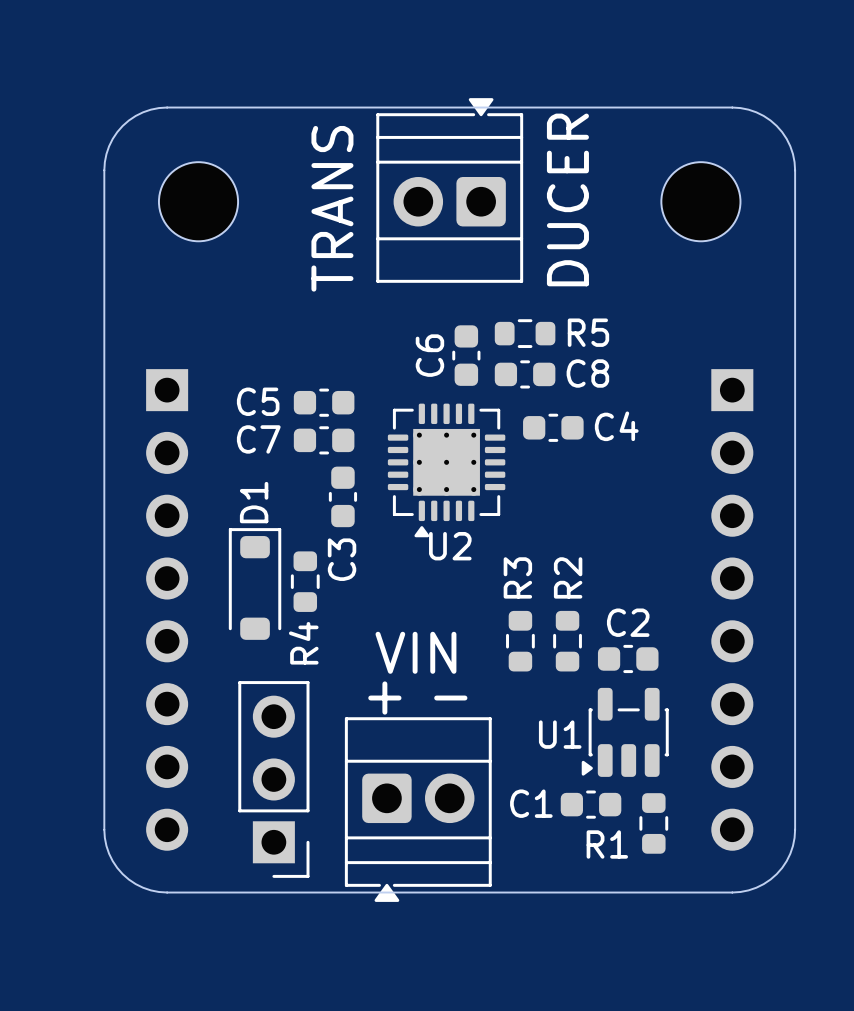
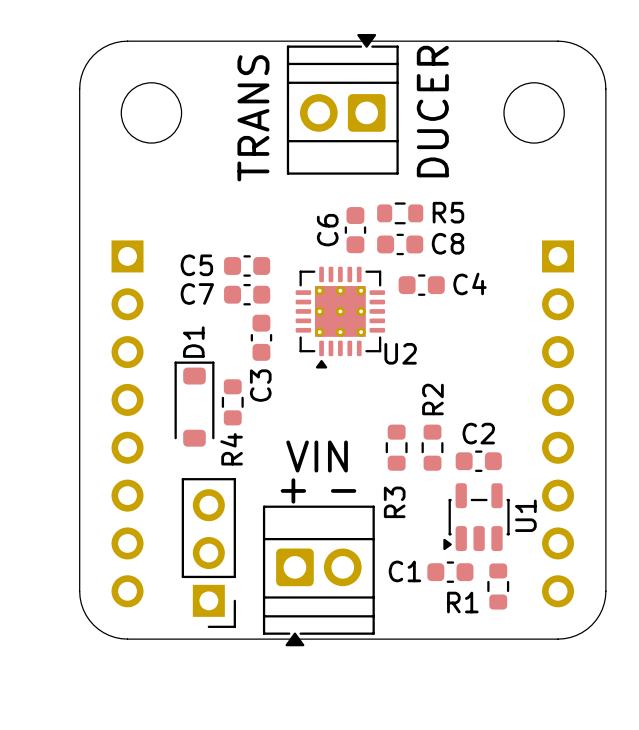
U2 name position: U2 (450, 546) -> U2 (400, 353)
R3 name position: R3 (517, 577) -> R3 (394, 502)
U1 name rotation: 0° (560, 734) -> 90° counterclockwise (525, 515)
U1 name position: U1 (560, 734) -> U1 (525, 515)

